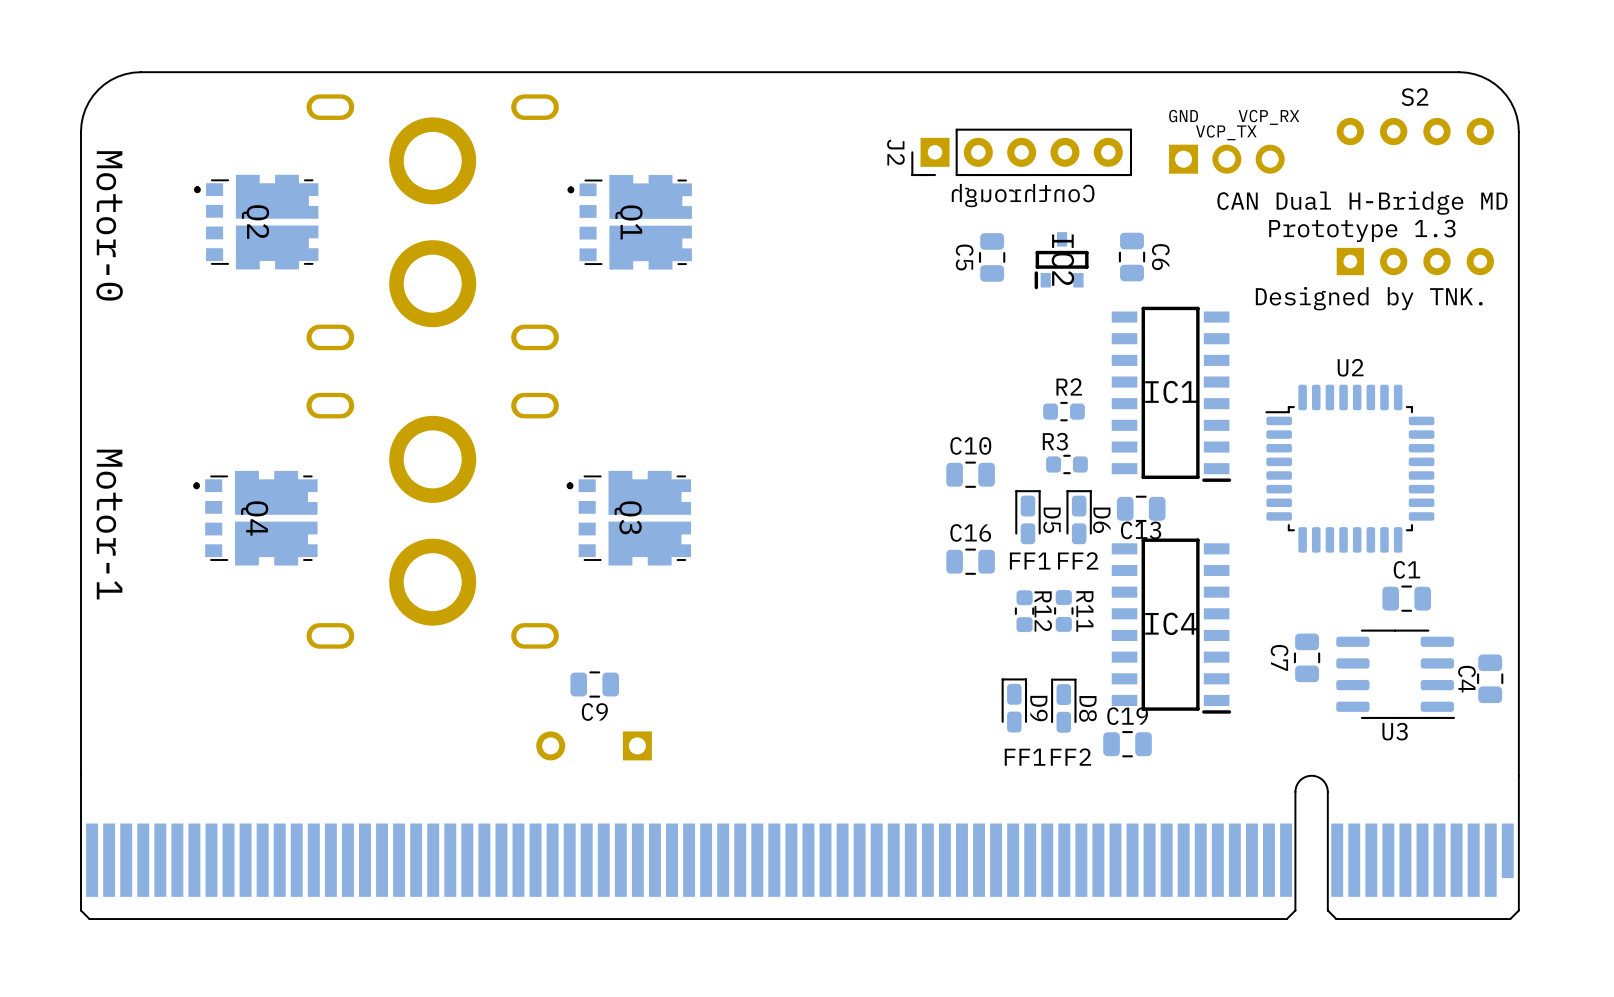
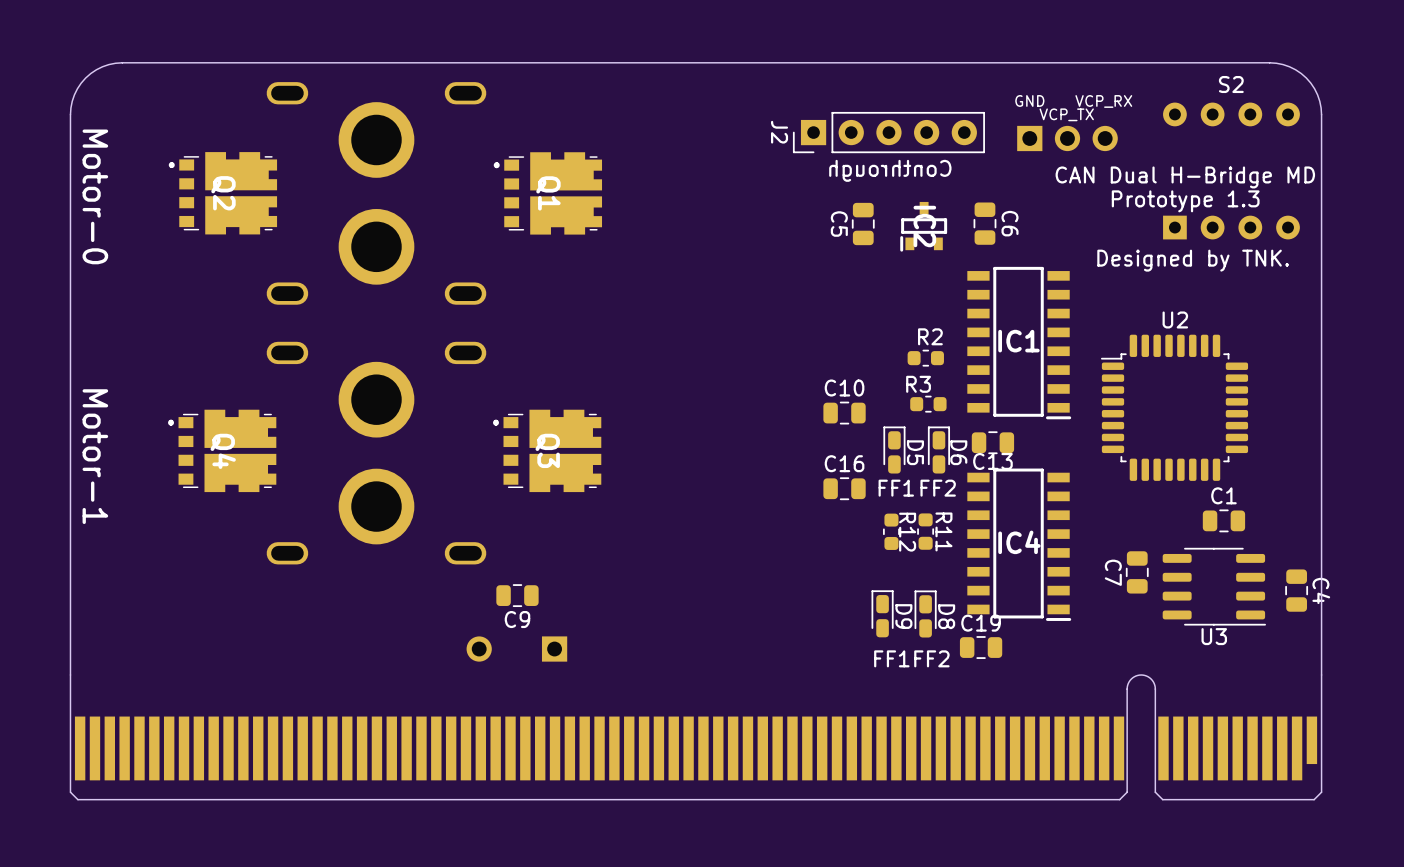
C4 name position: C4 (1466, 679) -> C4 (1321, 590)

